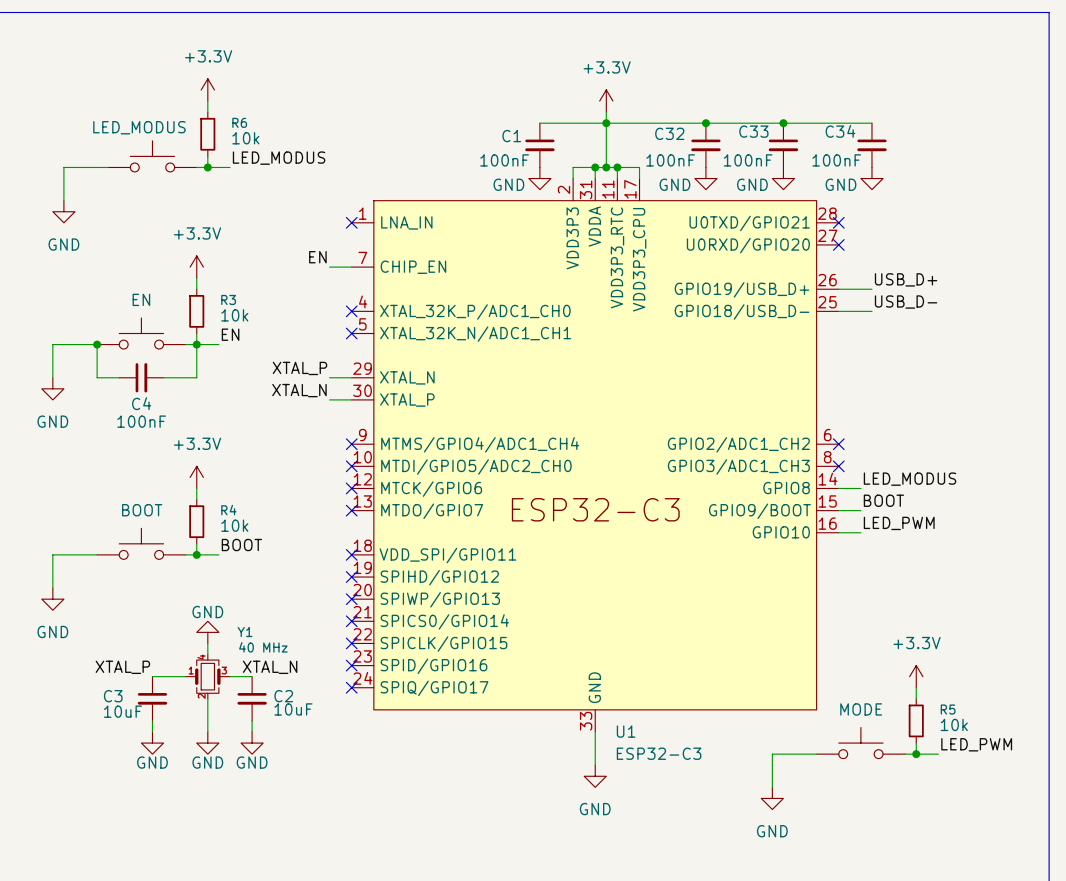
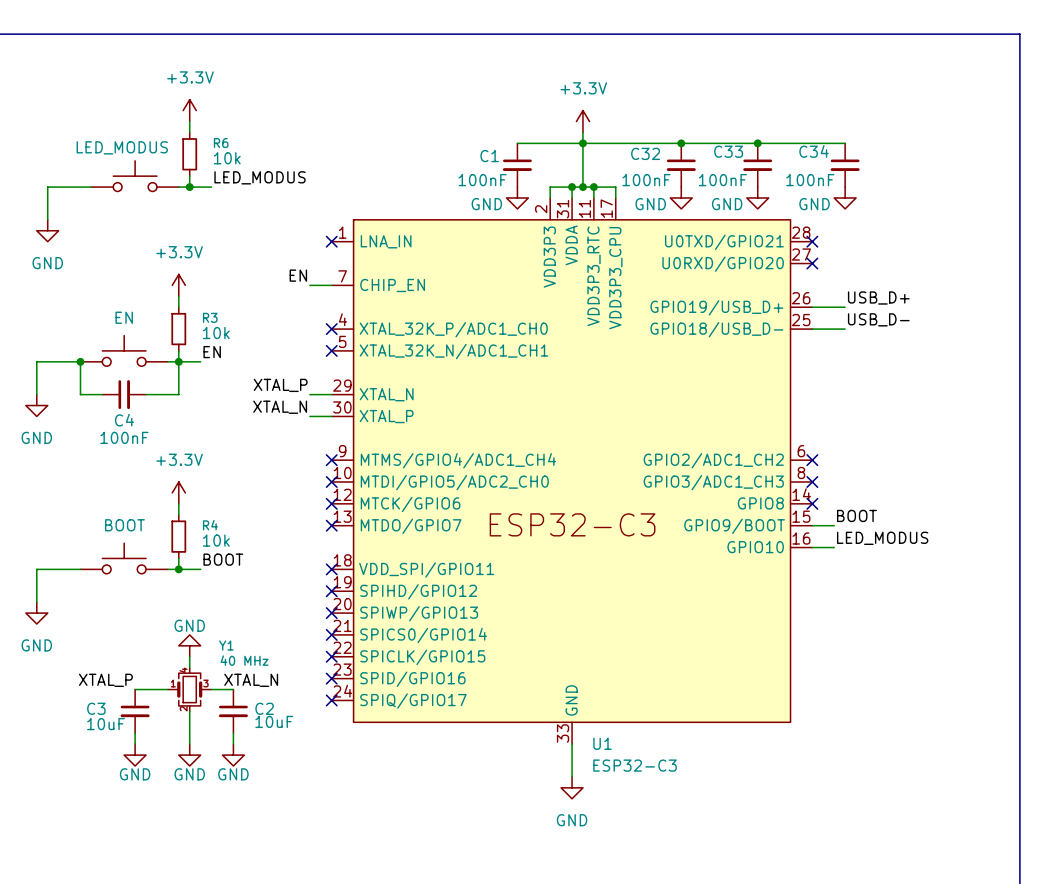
label: LED_MODUS (910, 479) -> none
wire: (838, 488) (860, 488) -> none
no-connect mark: none -> (812, 503)
label: LED_PWM (899, 523) -> LED_MODUS (882, 538)
power symbol: +3.3V (916, 676) -> none
wire: (916, 687) (916, 698) -> none
R5: 10k (916, 720) -> none
part: MODE (860, 743) -> none
wire: (916, 743) (916, 754) -> none
label: LED_PWM (976, 744) -> none
wire: (816, 754) (772, 754) (772, 787) -> none
wire: (905, 754) (938, 754) -> none
junction: (916, 754) -> none
power symbol: GND (772, 798) -> none

